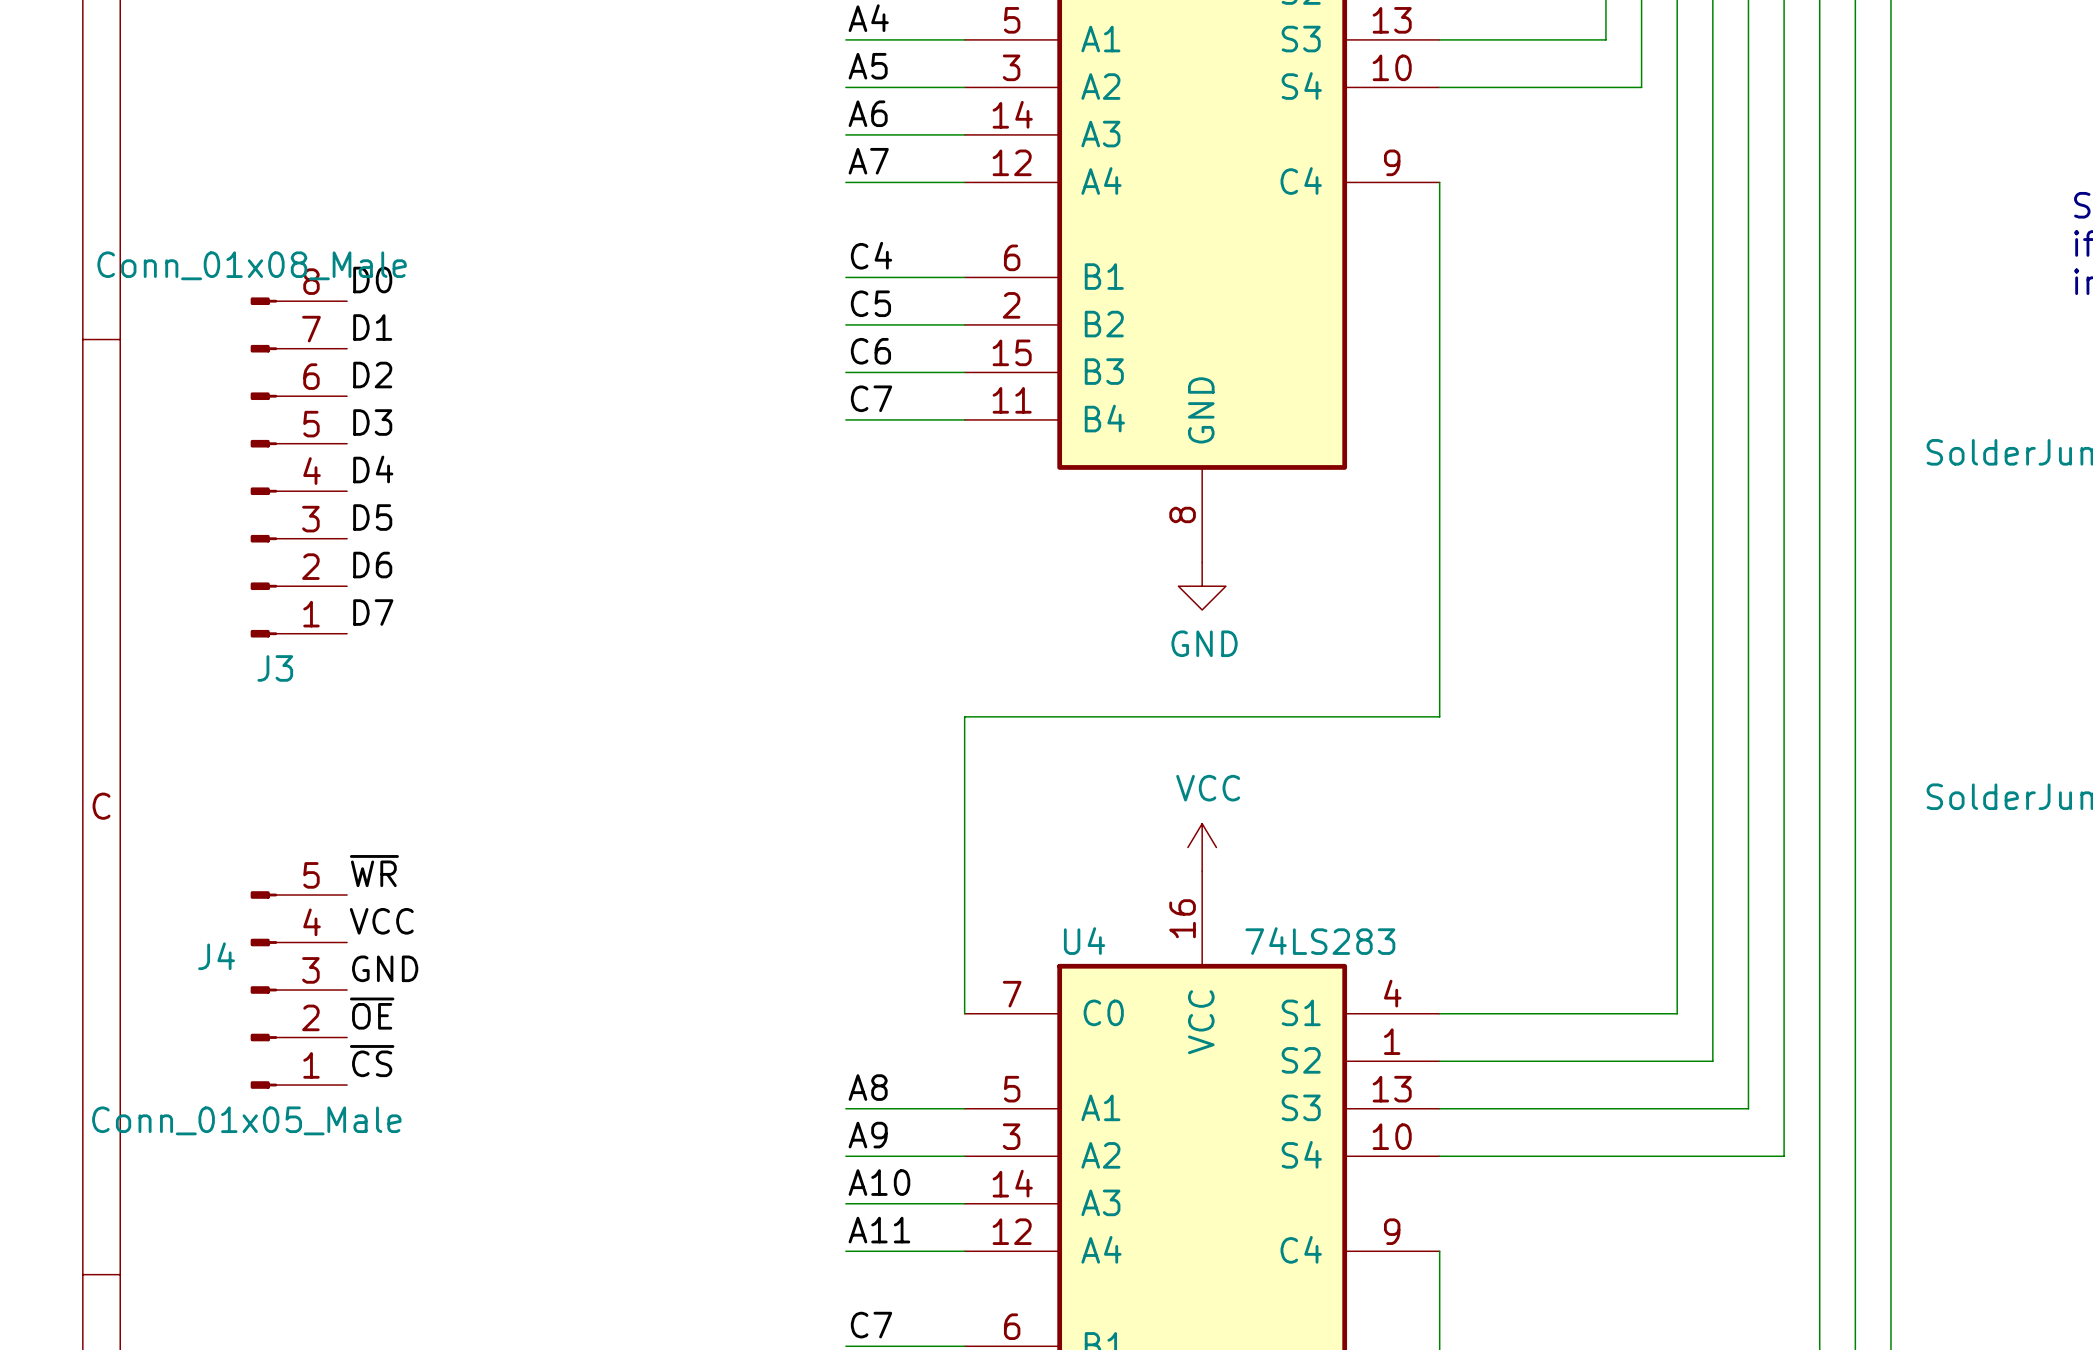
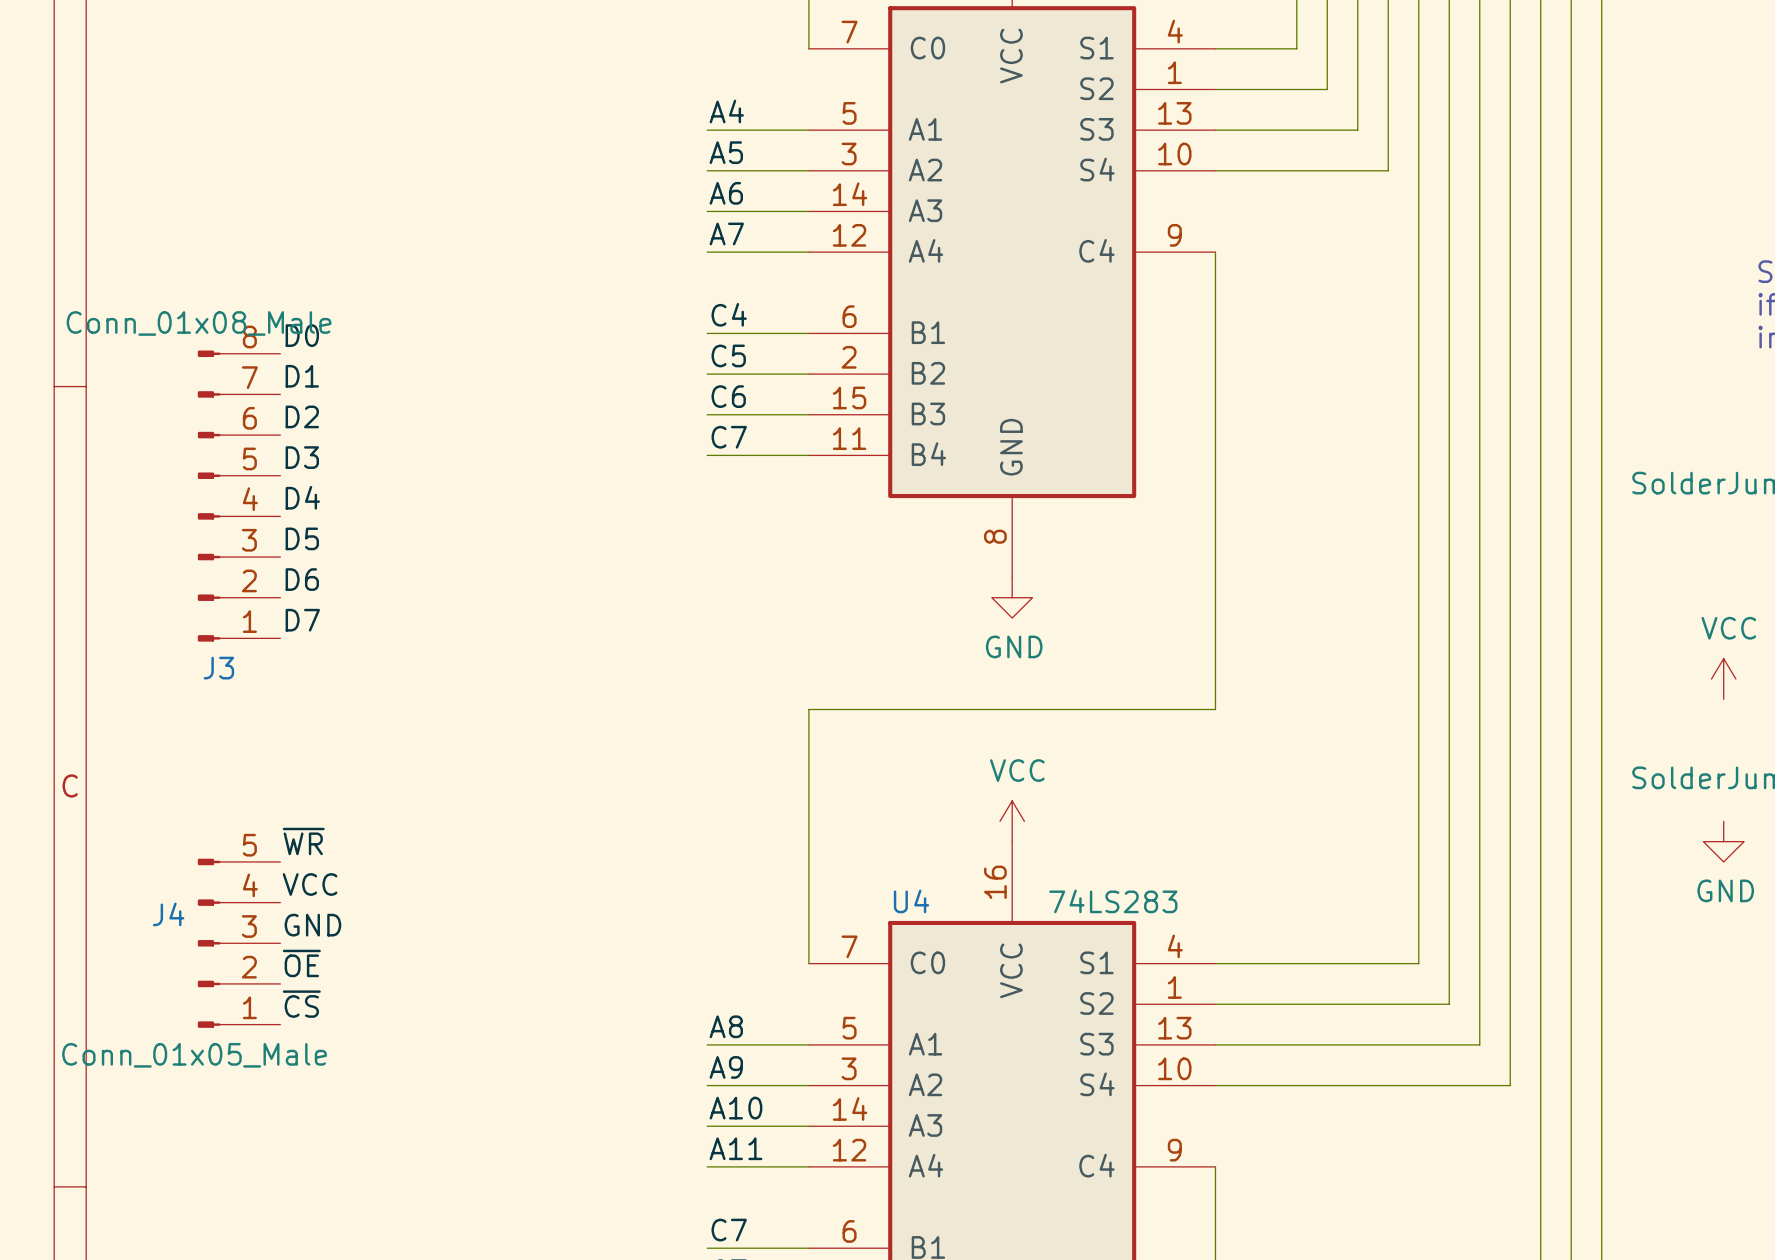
power symbol: none -> VCC (1723, 679)
power symbol: none -> GND (1723, 841)

